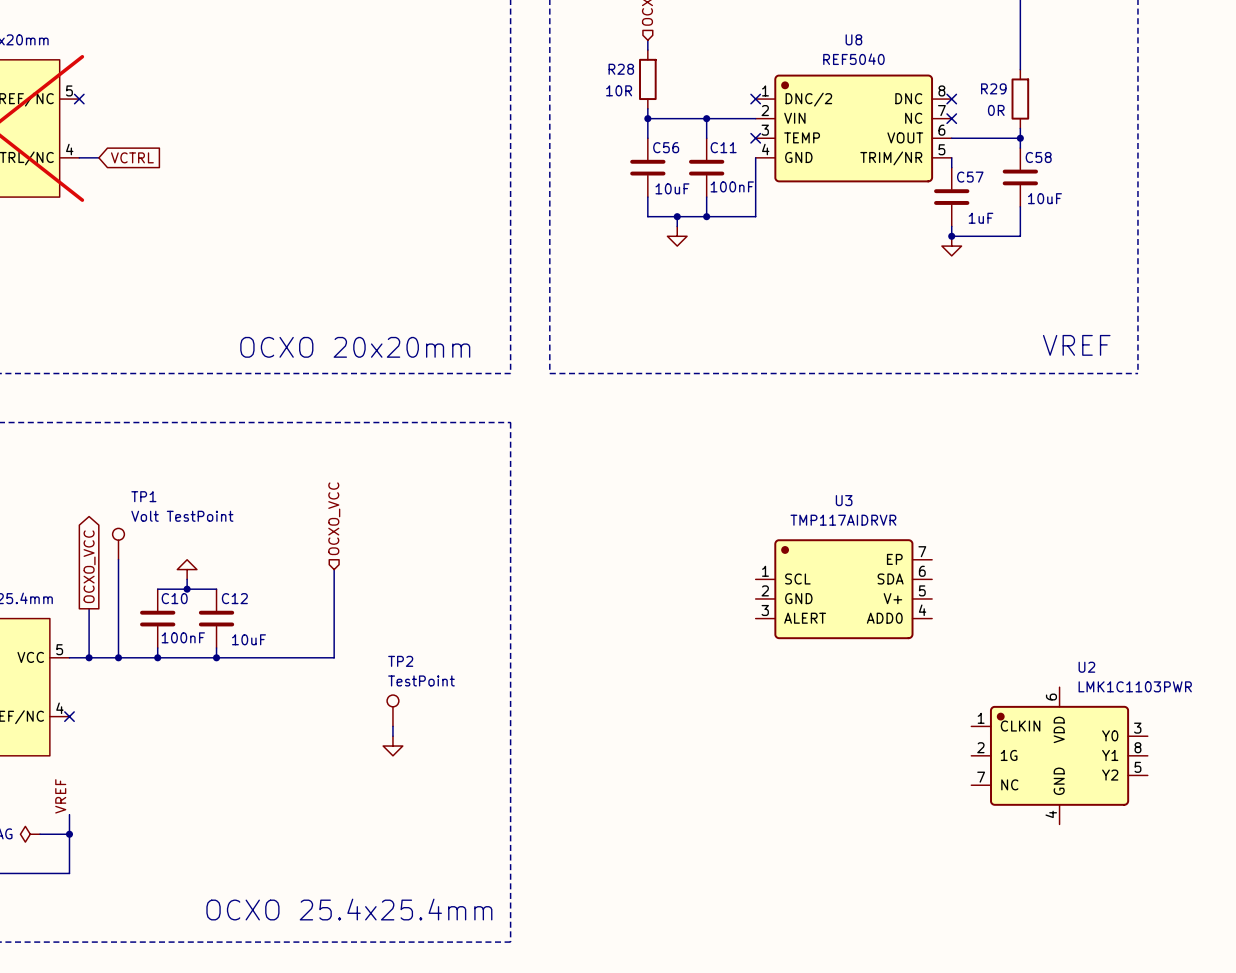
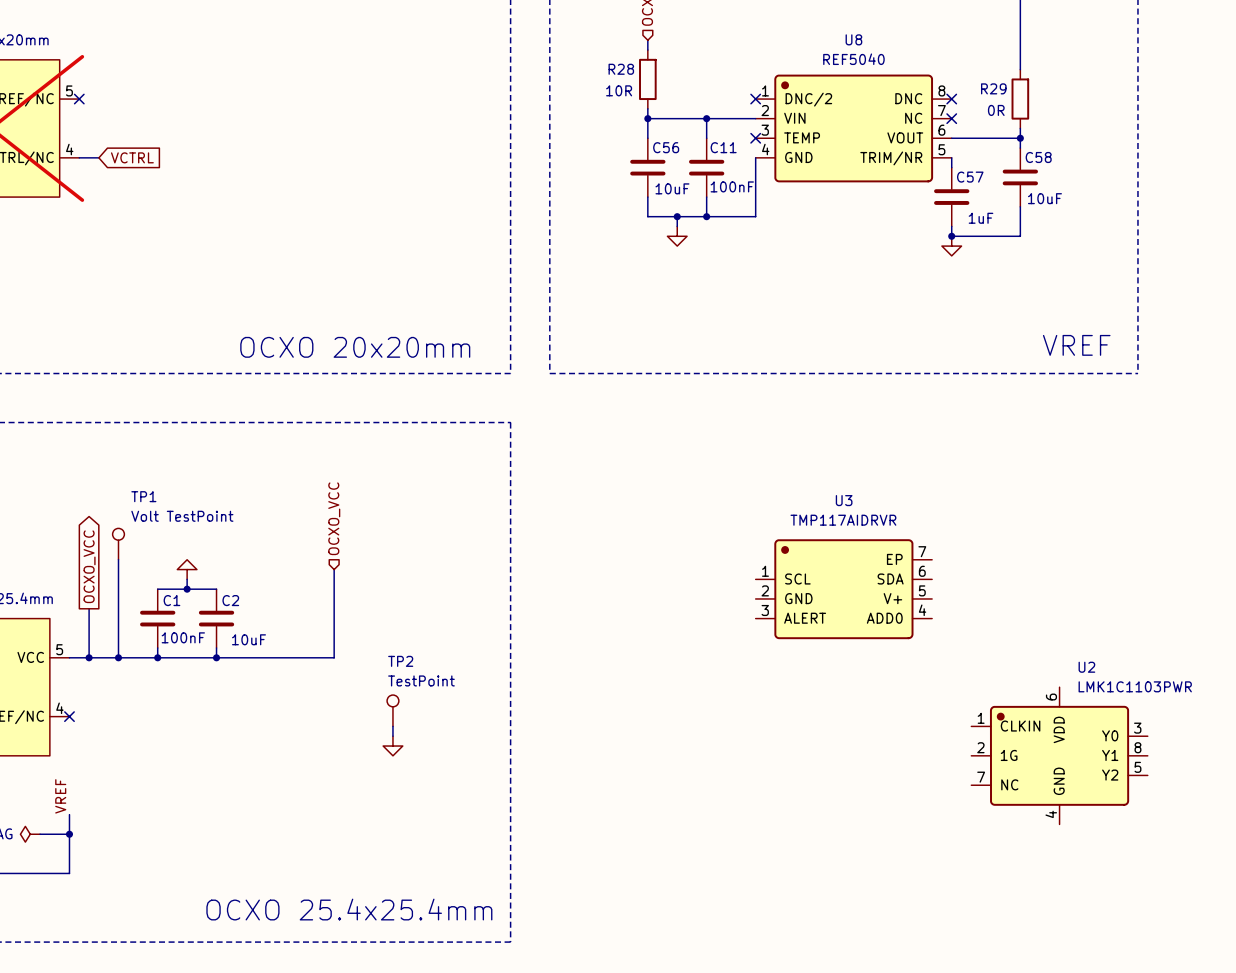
C10 name: C10 (174, 598) -> C1 (171, 600)
C12 name: C12 (234, 598) -> C2 (230, 600)

